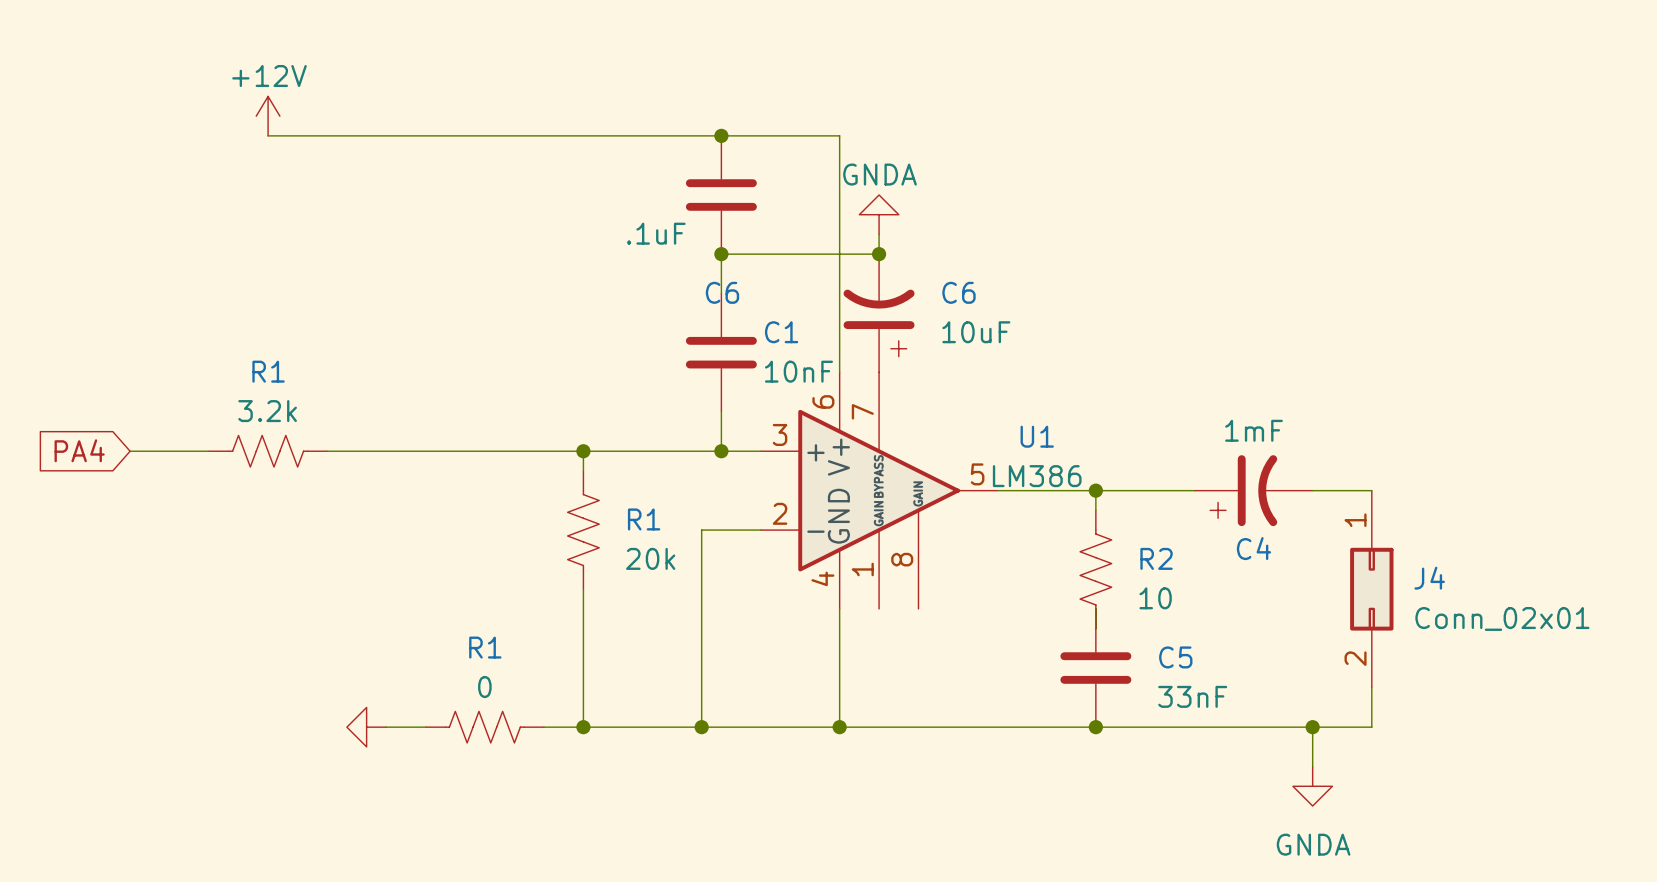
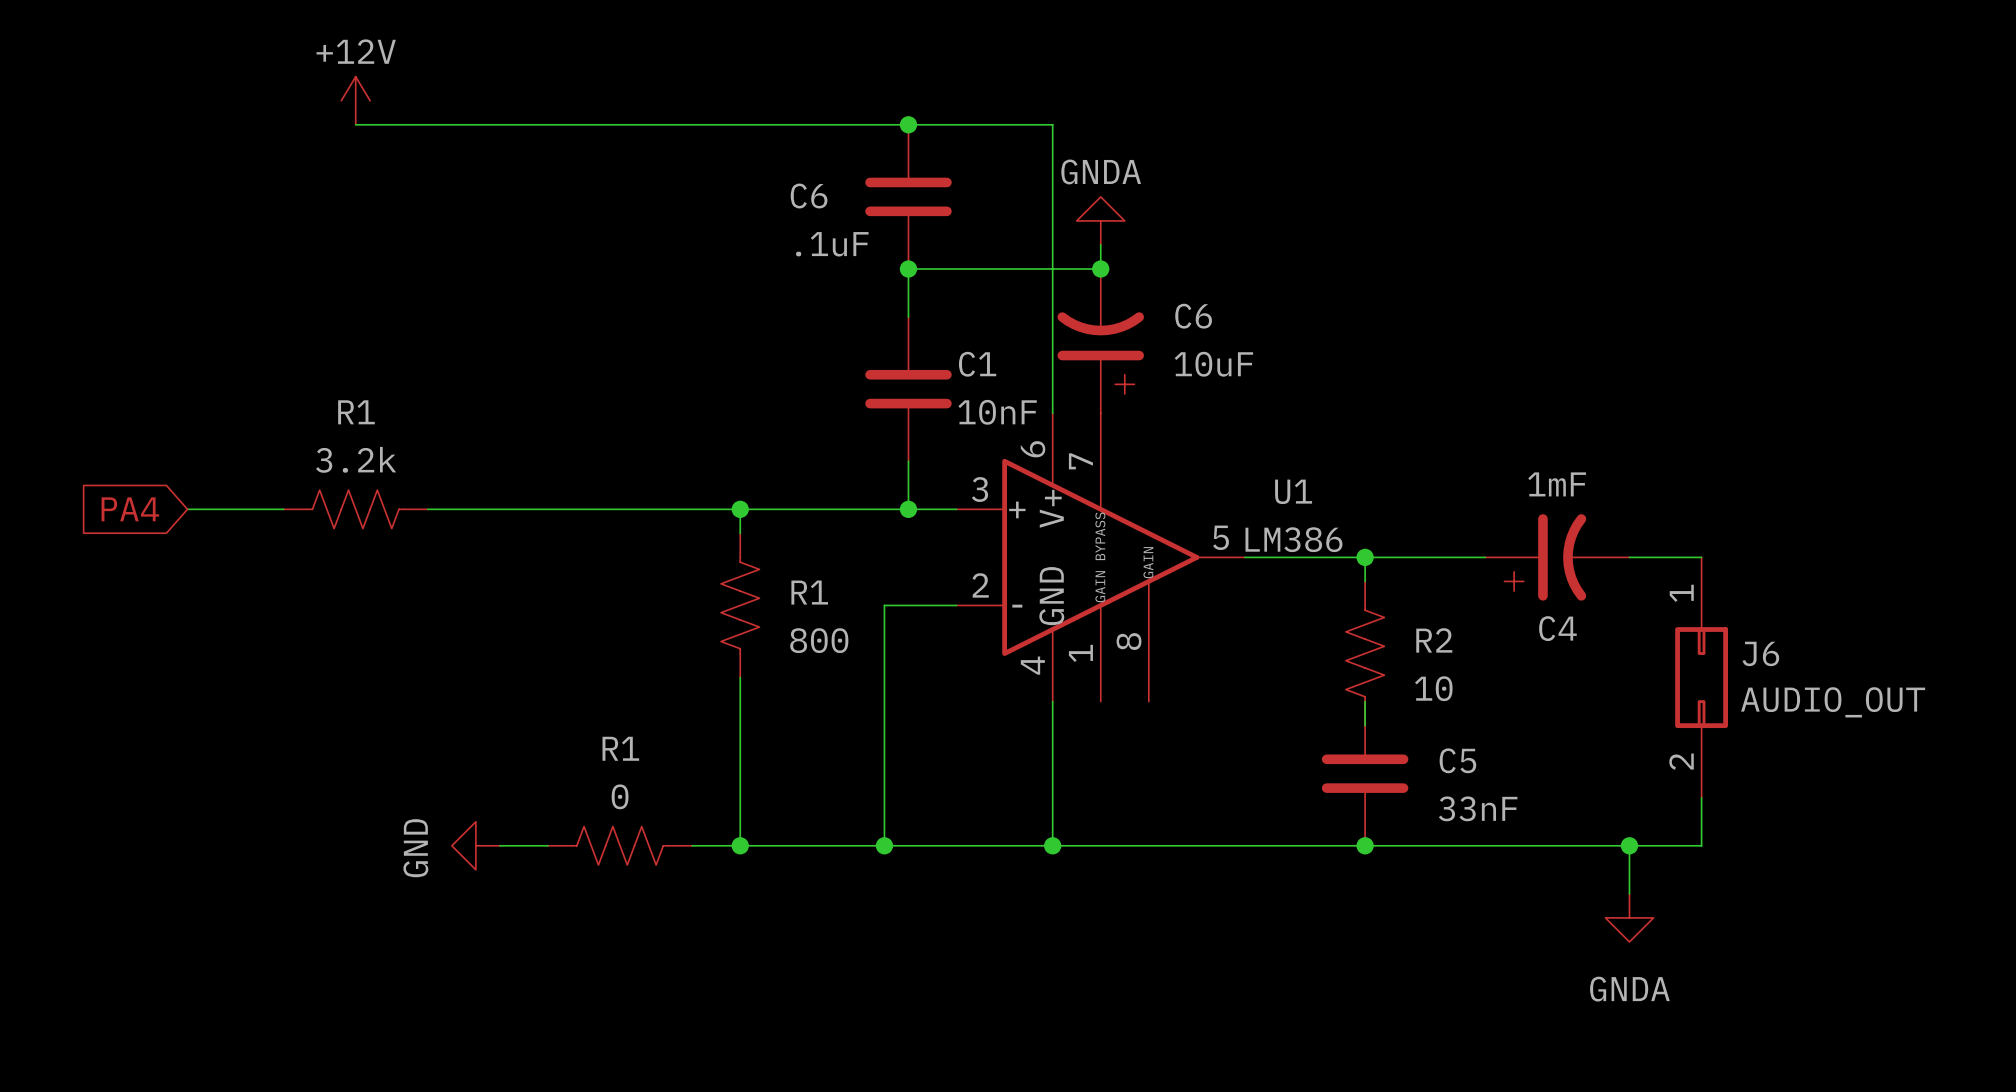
C6 name position: C6 (722, 292) -> C6 (809, 196)
R1 value: 20k (650, 558) -> 800 (819, 640)
J4 name: J4 (1429, 578) -> J6 (1760, 653)
J4 value: Conn_02x01 (1502, 618) -> AUDIO_OUT (1833, 702)
power symbol text: none -> GND (415, 848)

